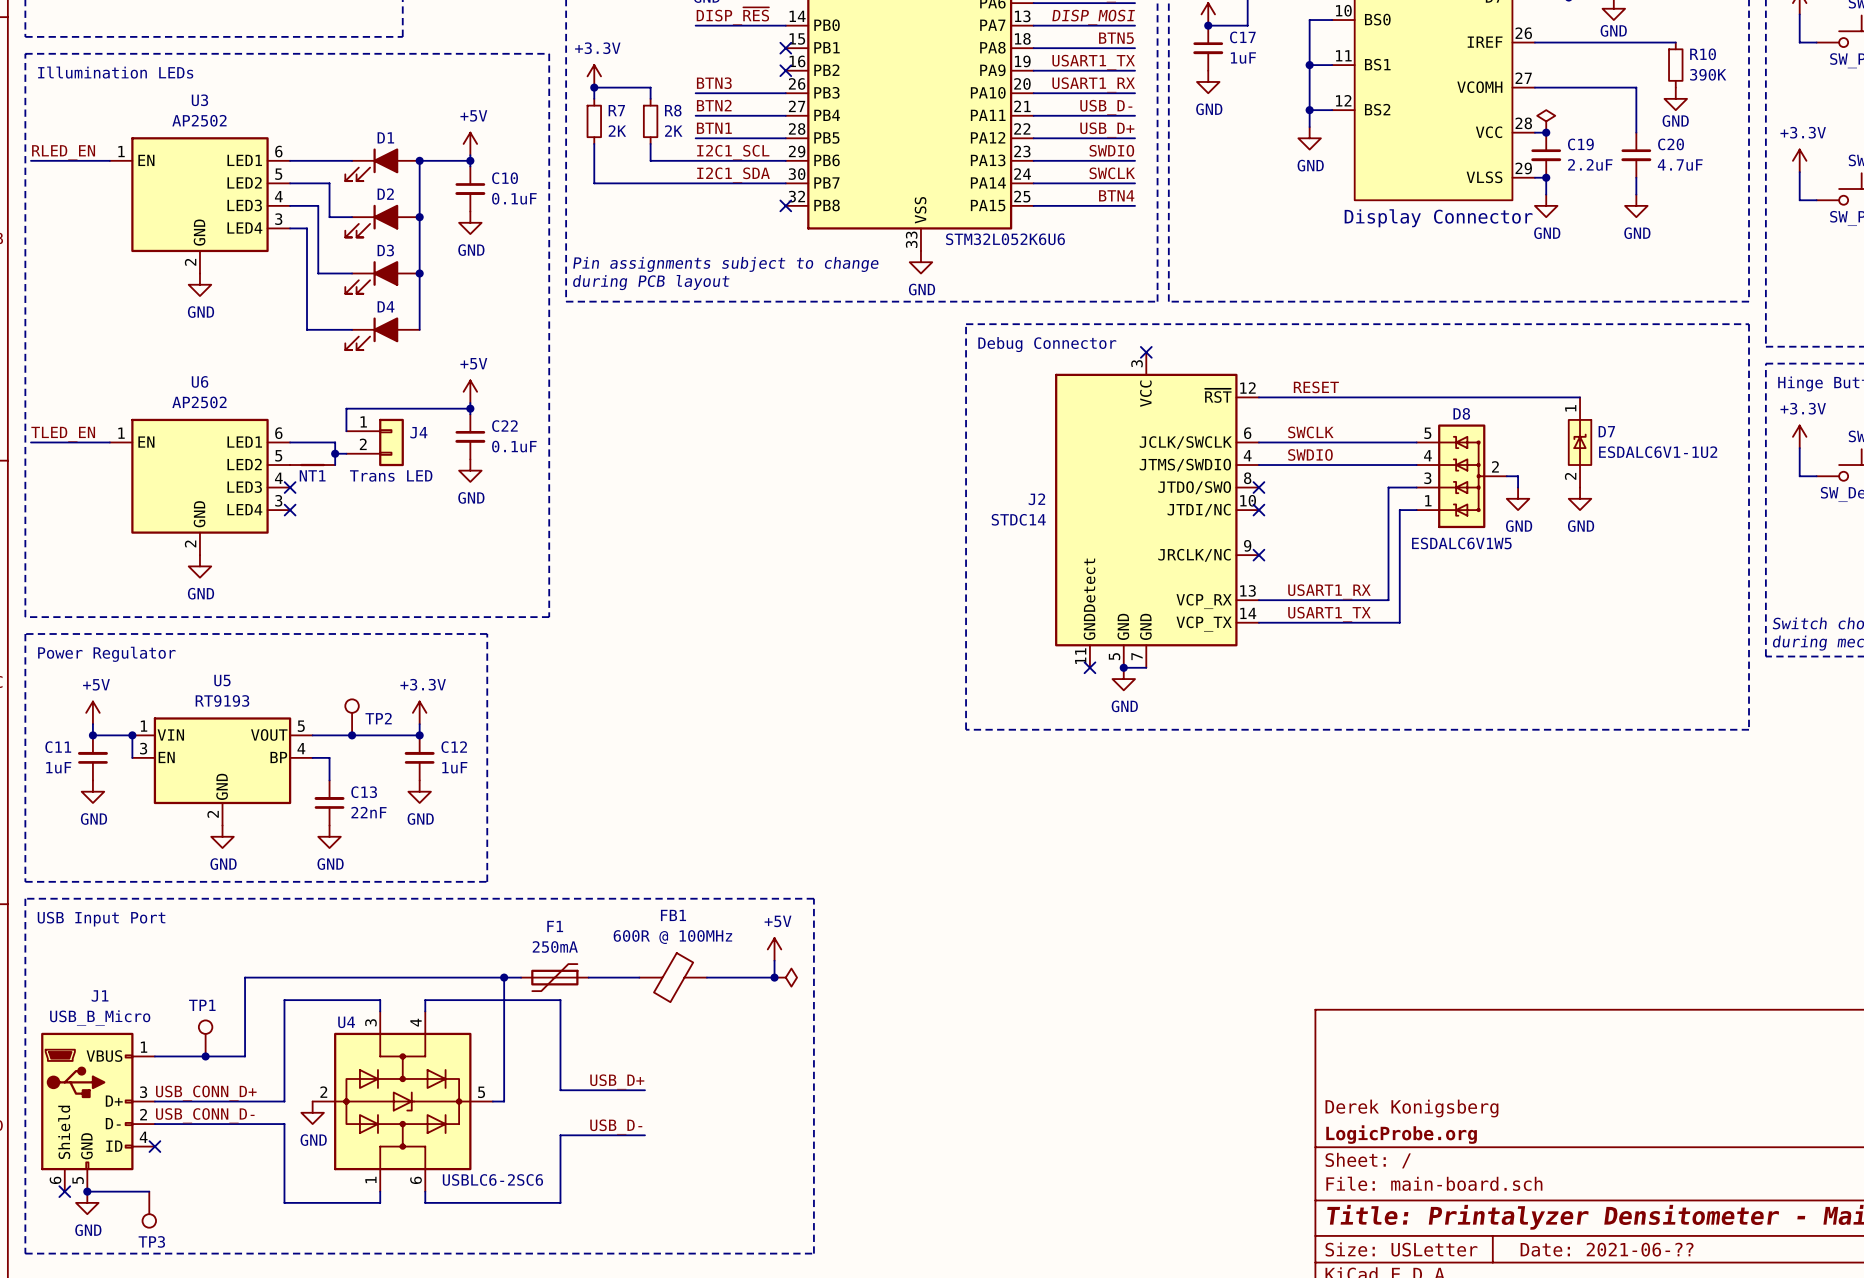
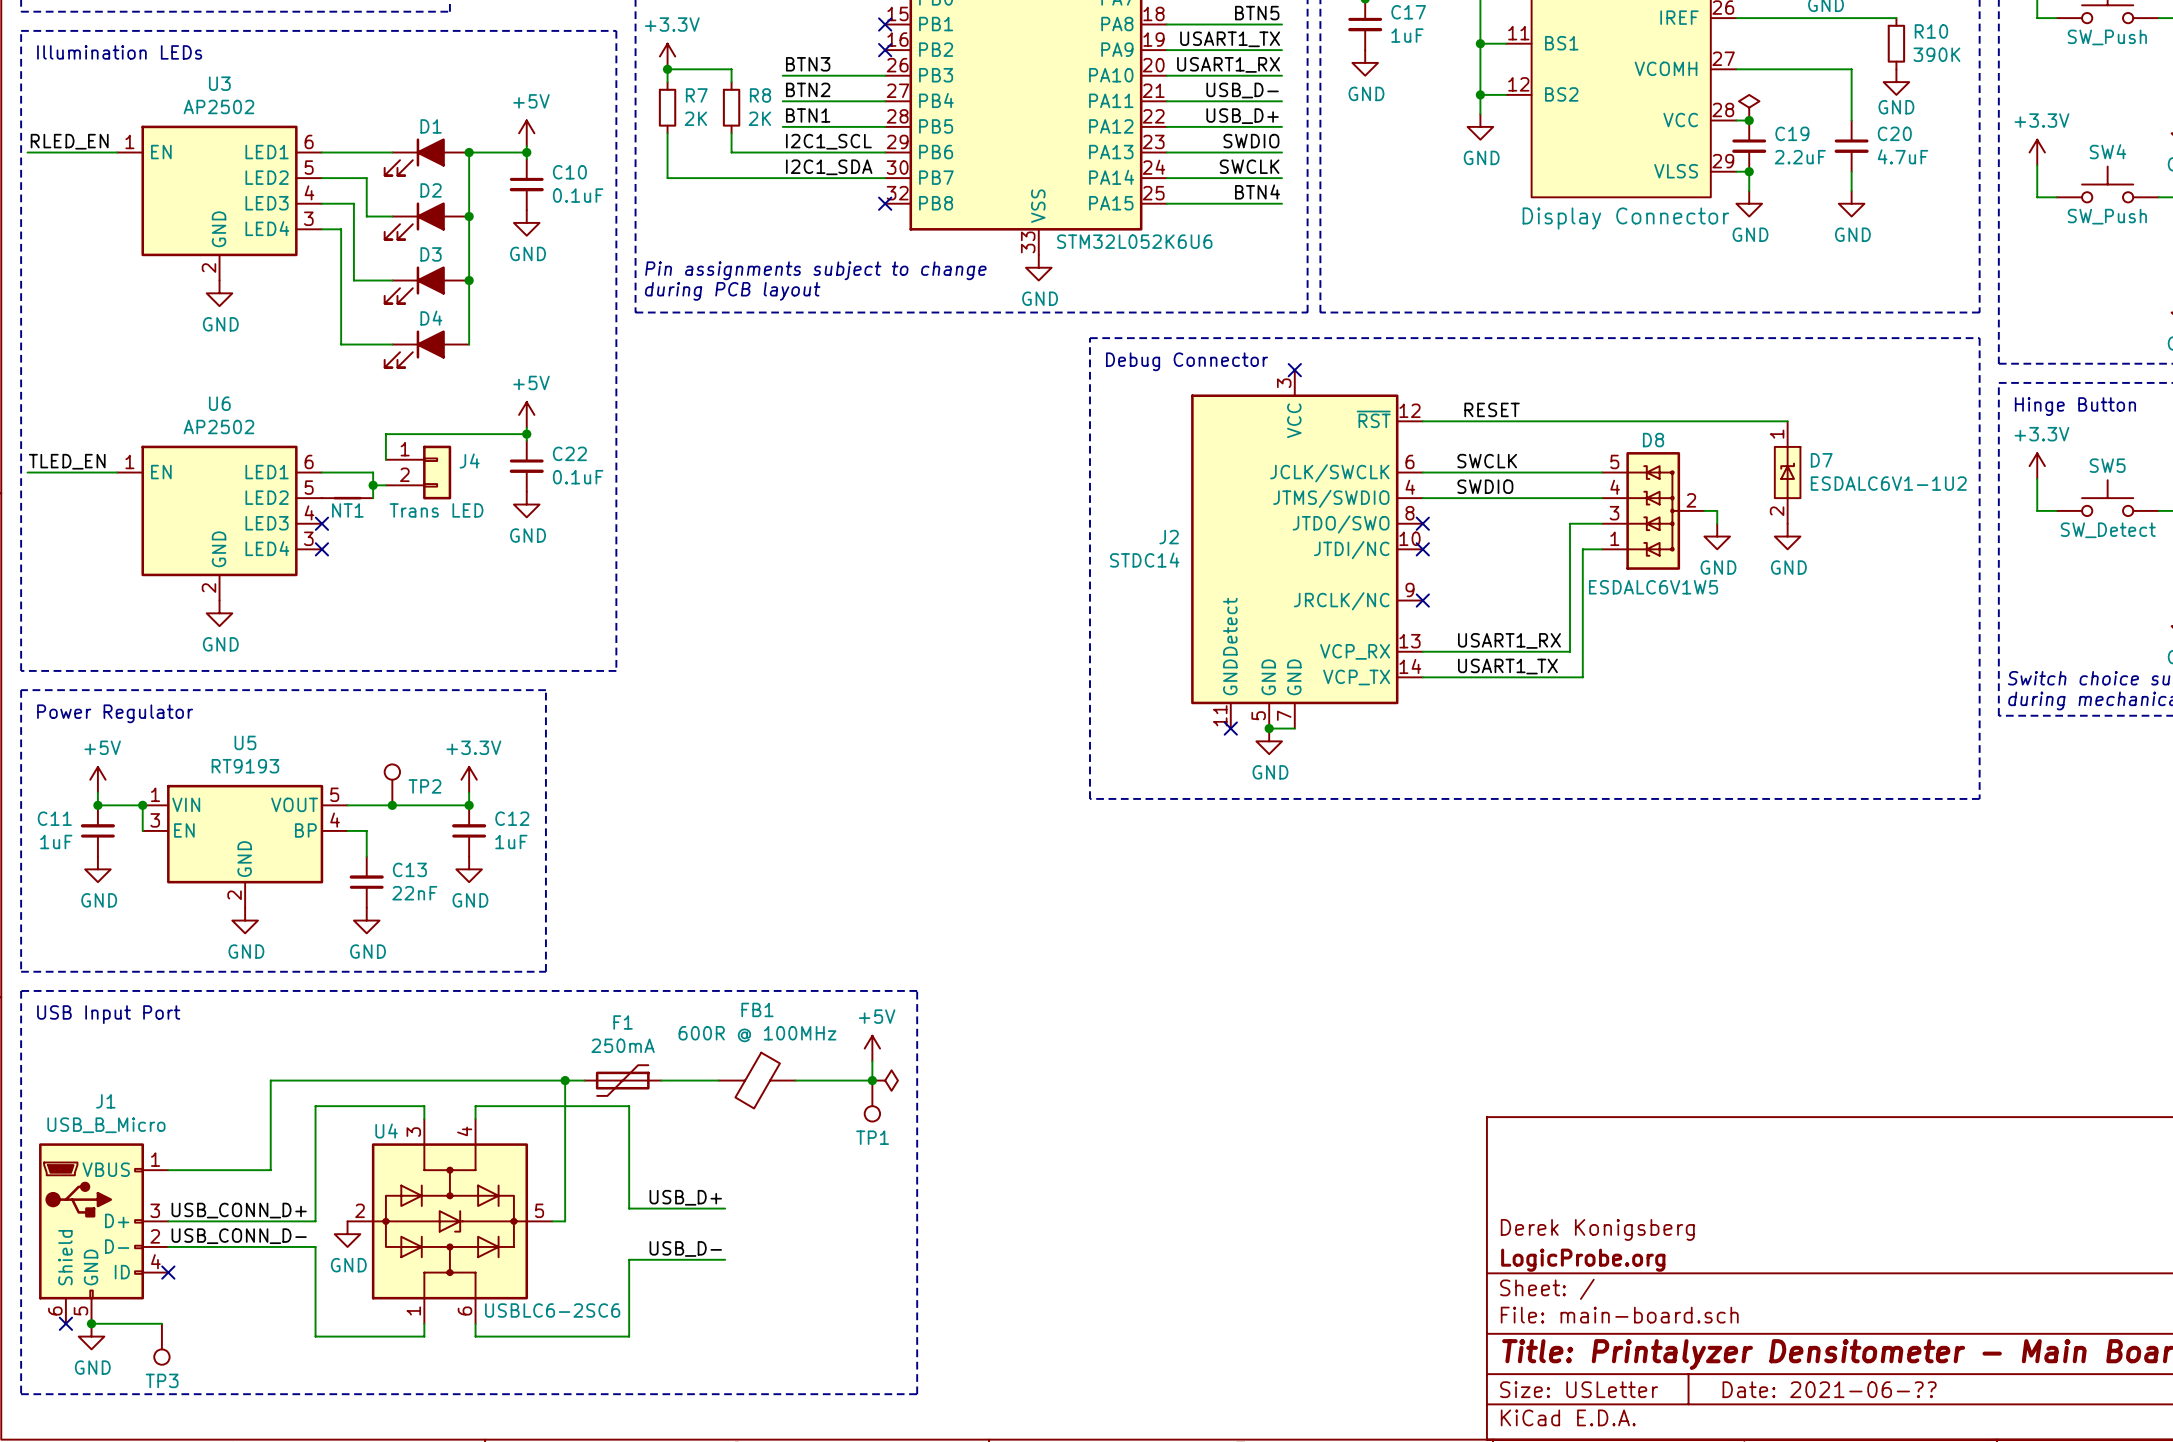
TP1 rotation: 0° (205, 1027) -> 180° (872, 1113)
TP1 position: (205, 1038) -> (872, 1101)
junction: (205, 1056) -> none

